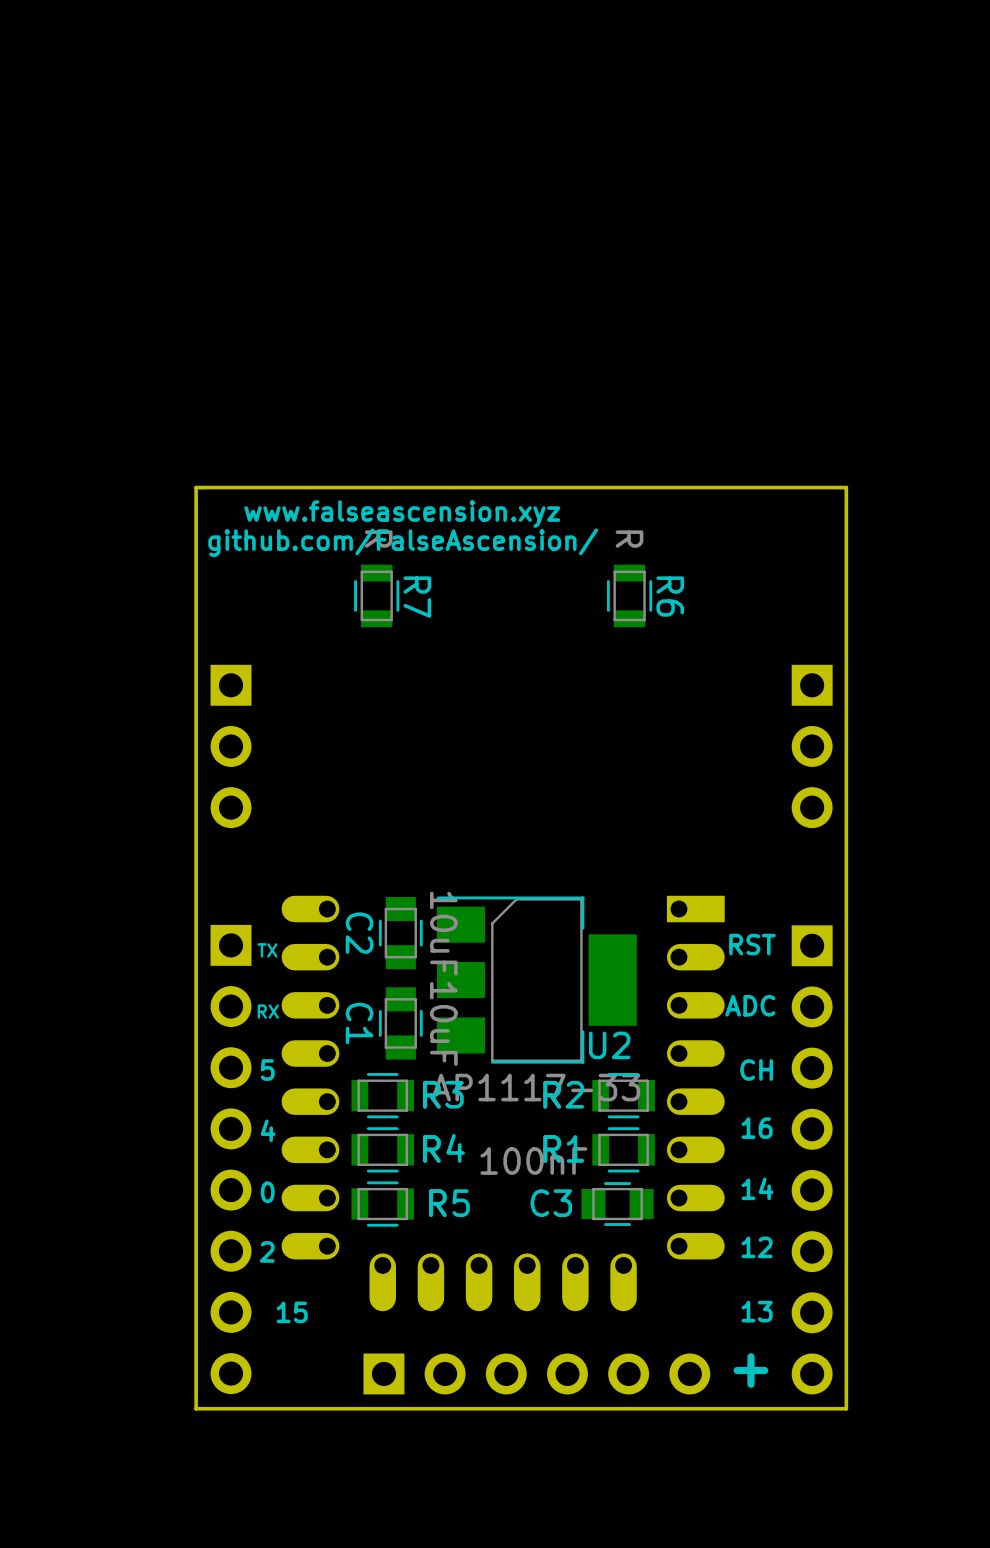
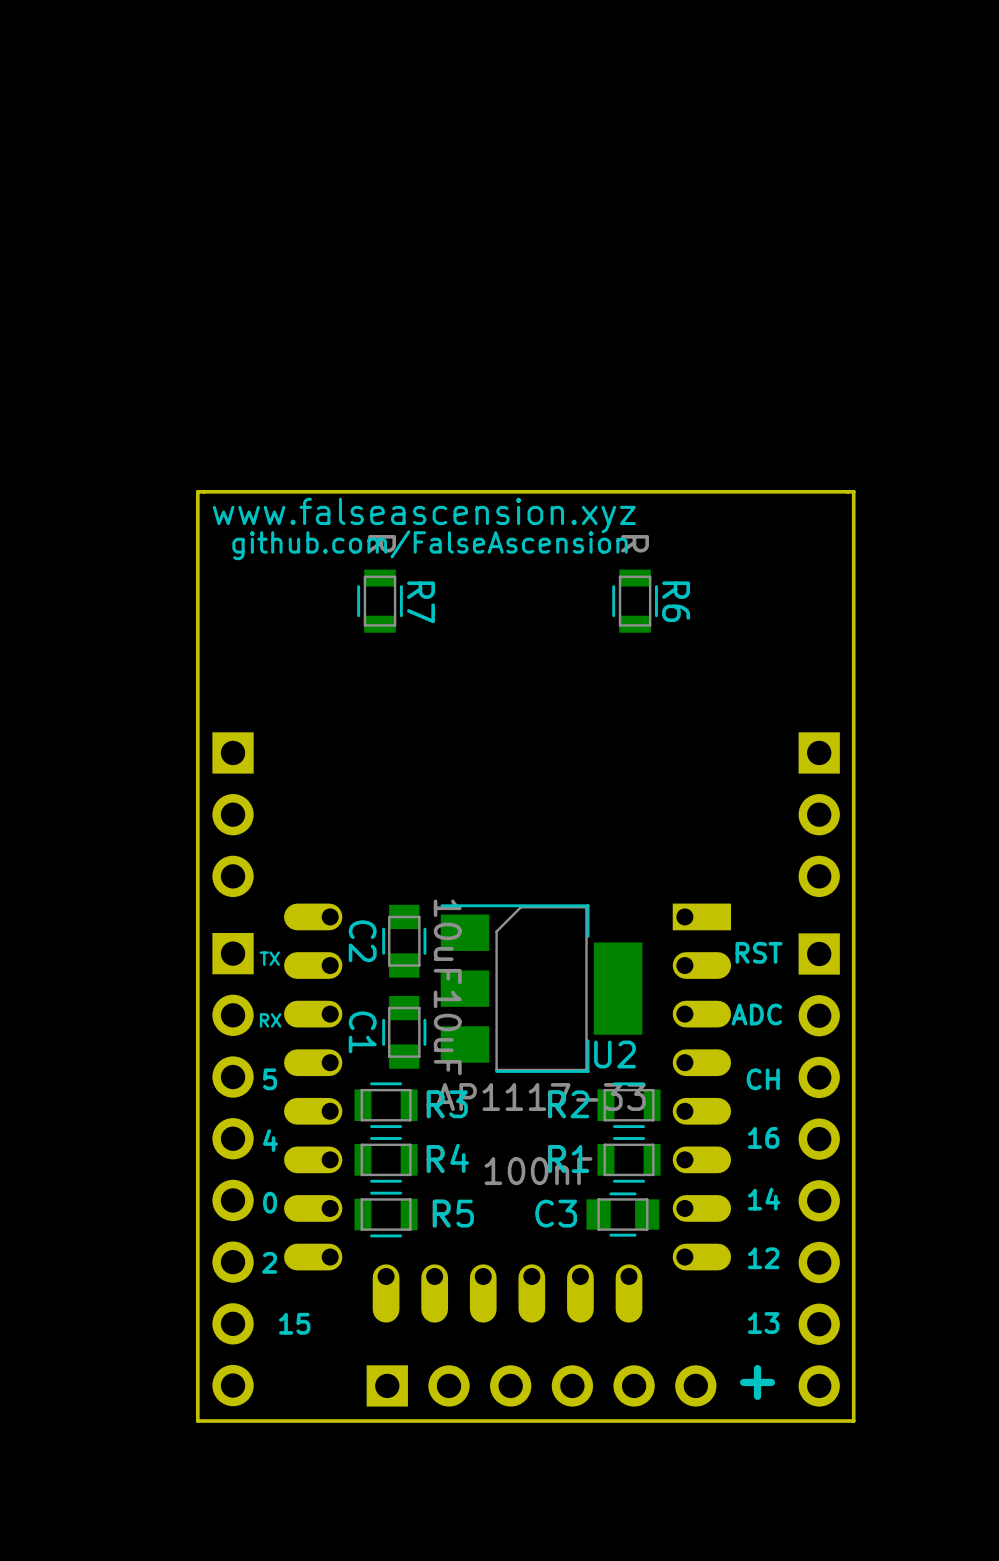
drawing: none -> [212, 497, 636, 561]
text: www.falseascension.xyz (402, 514) -> none
text: github.com/FalseAscension/ (403, 542) -> none
part position: (231, 746) -> (233, 814)
part position: (812, 746) -> (819, 814)

